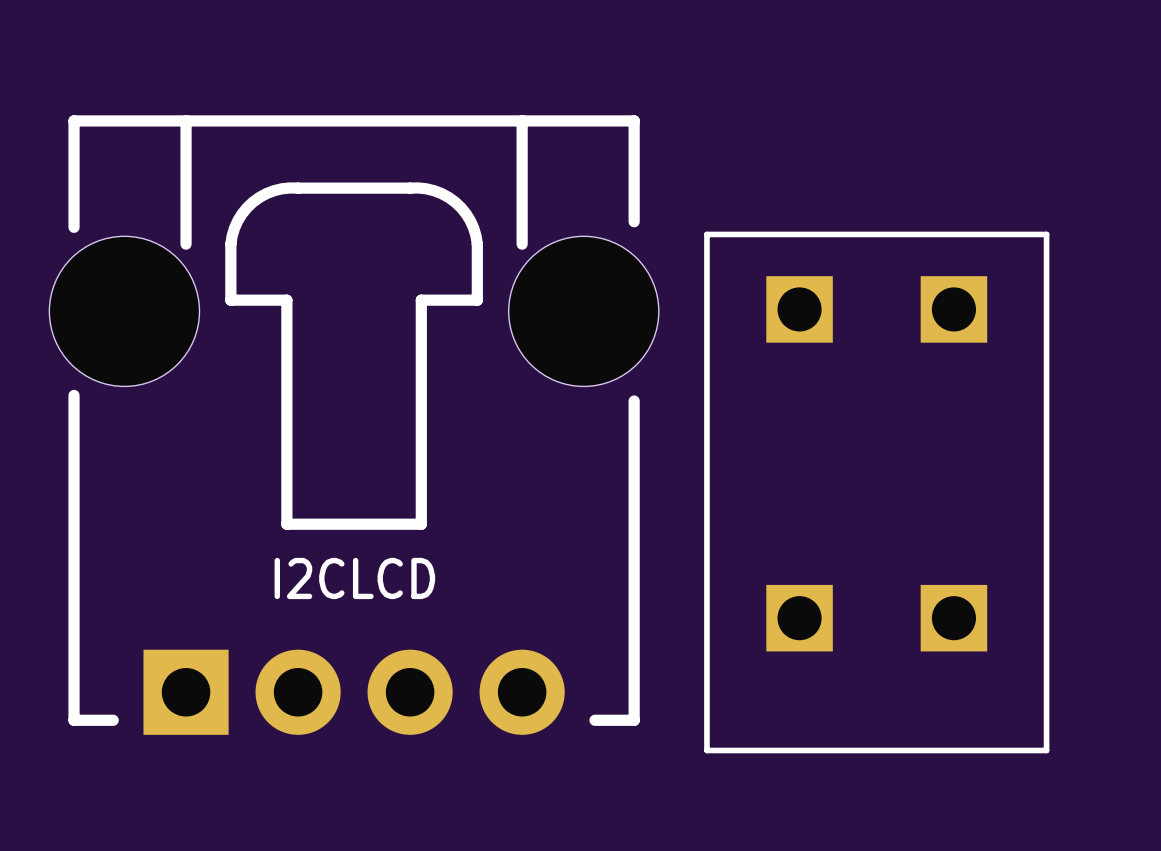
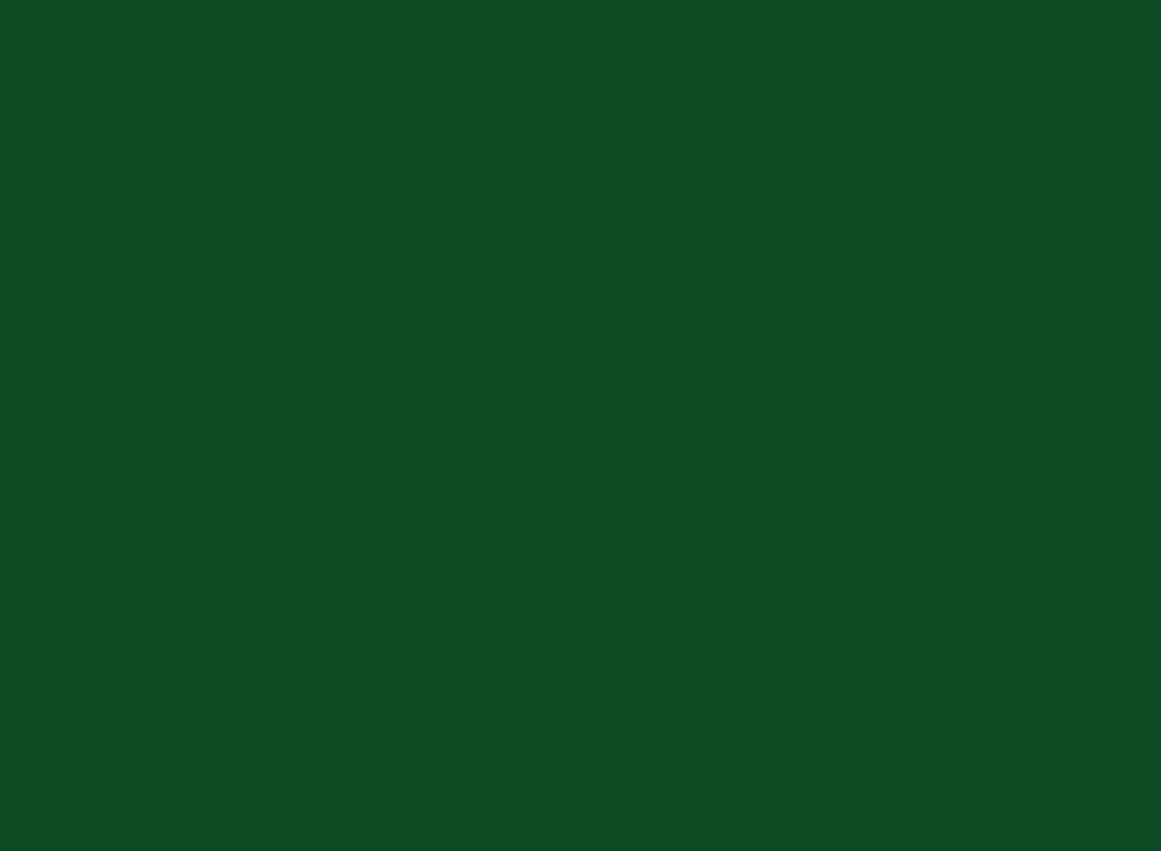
I2CLCD: (354, 425) -> none
part: (876, 492) -> none

